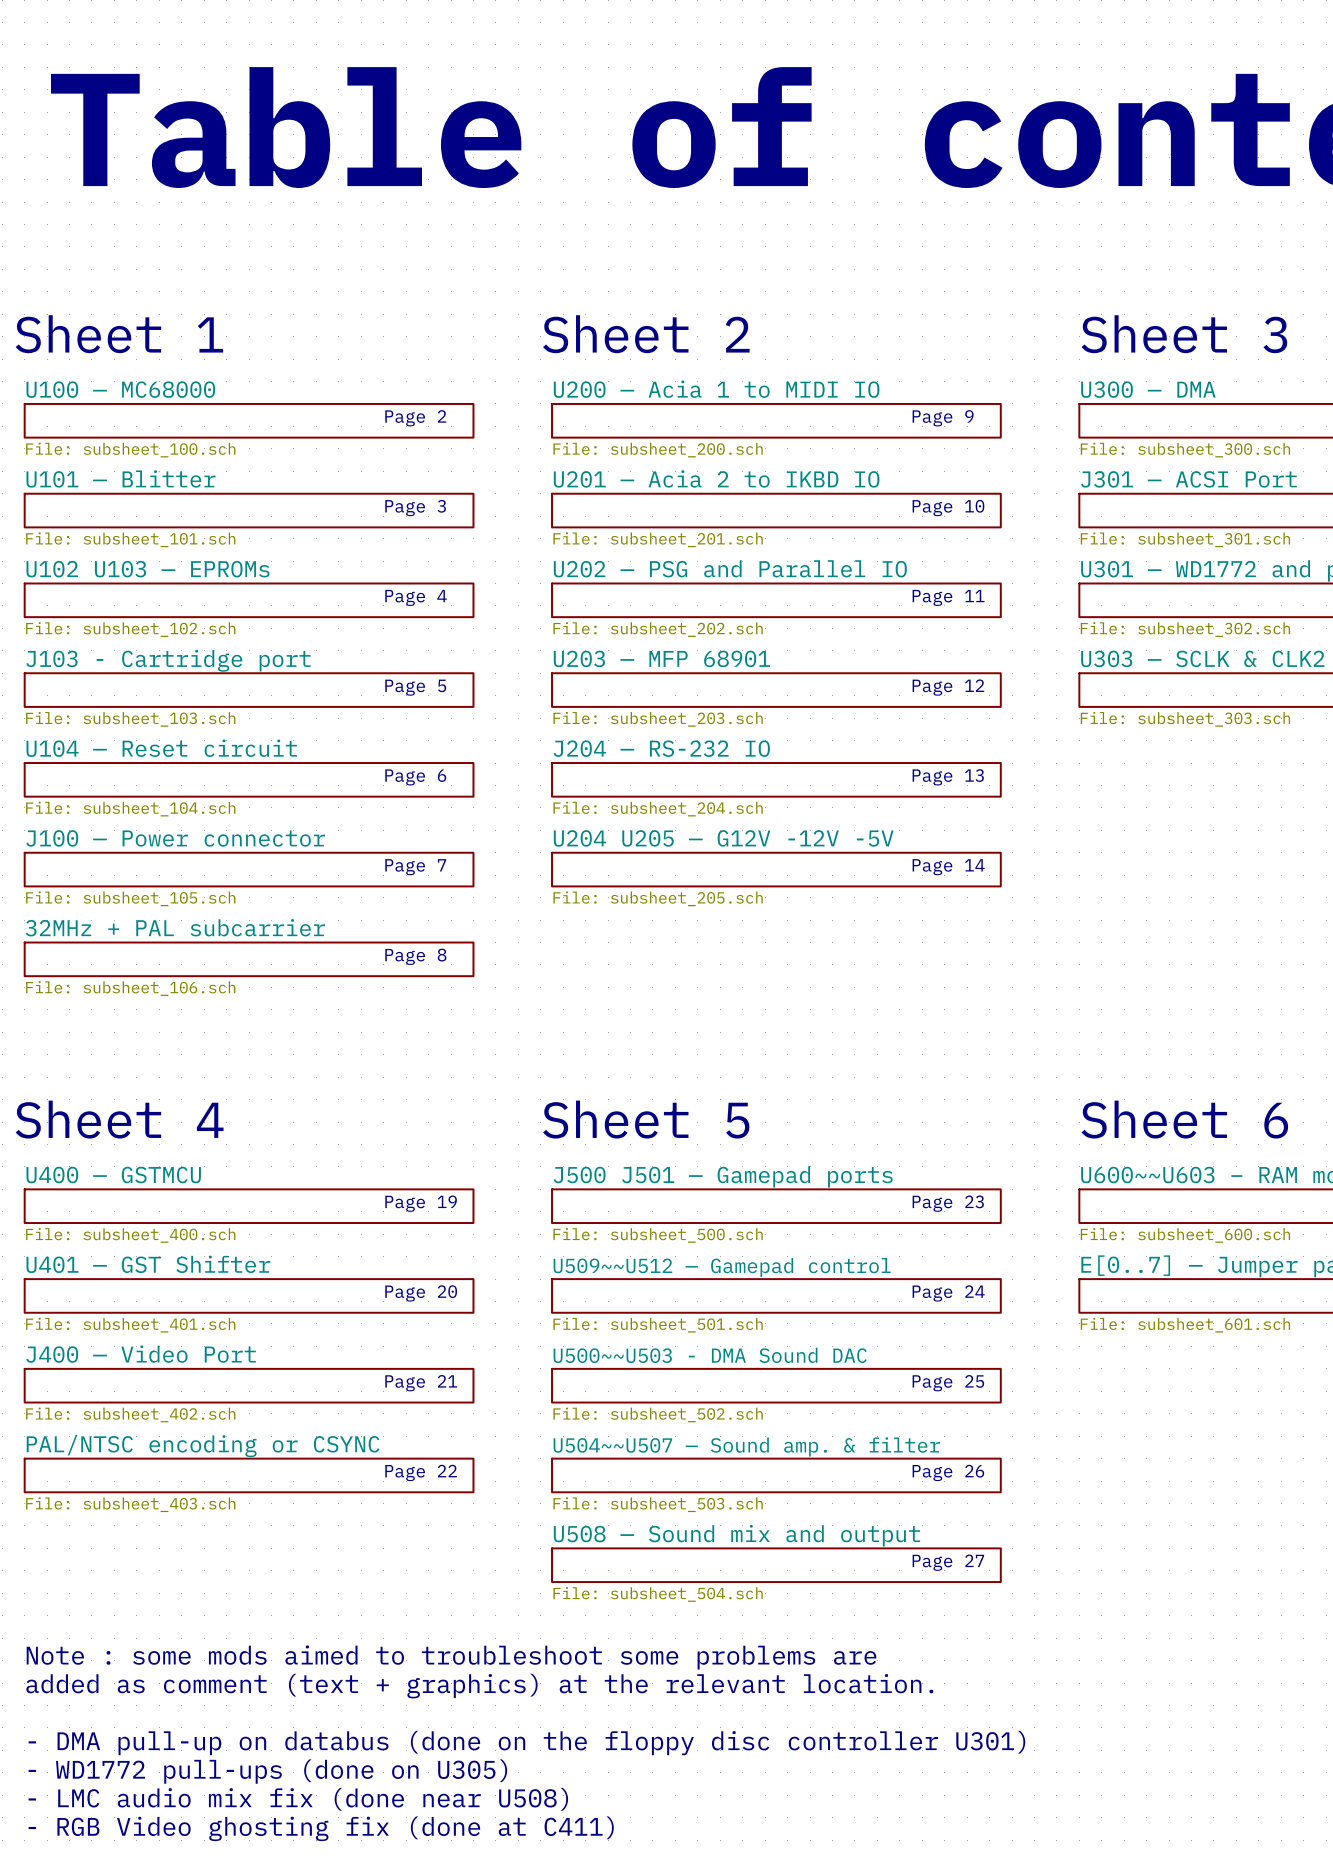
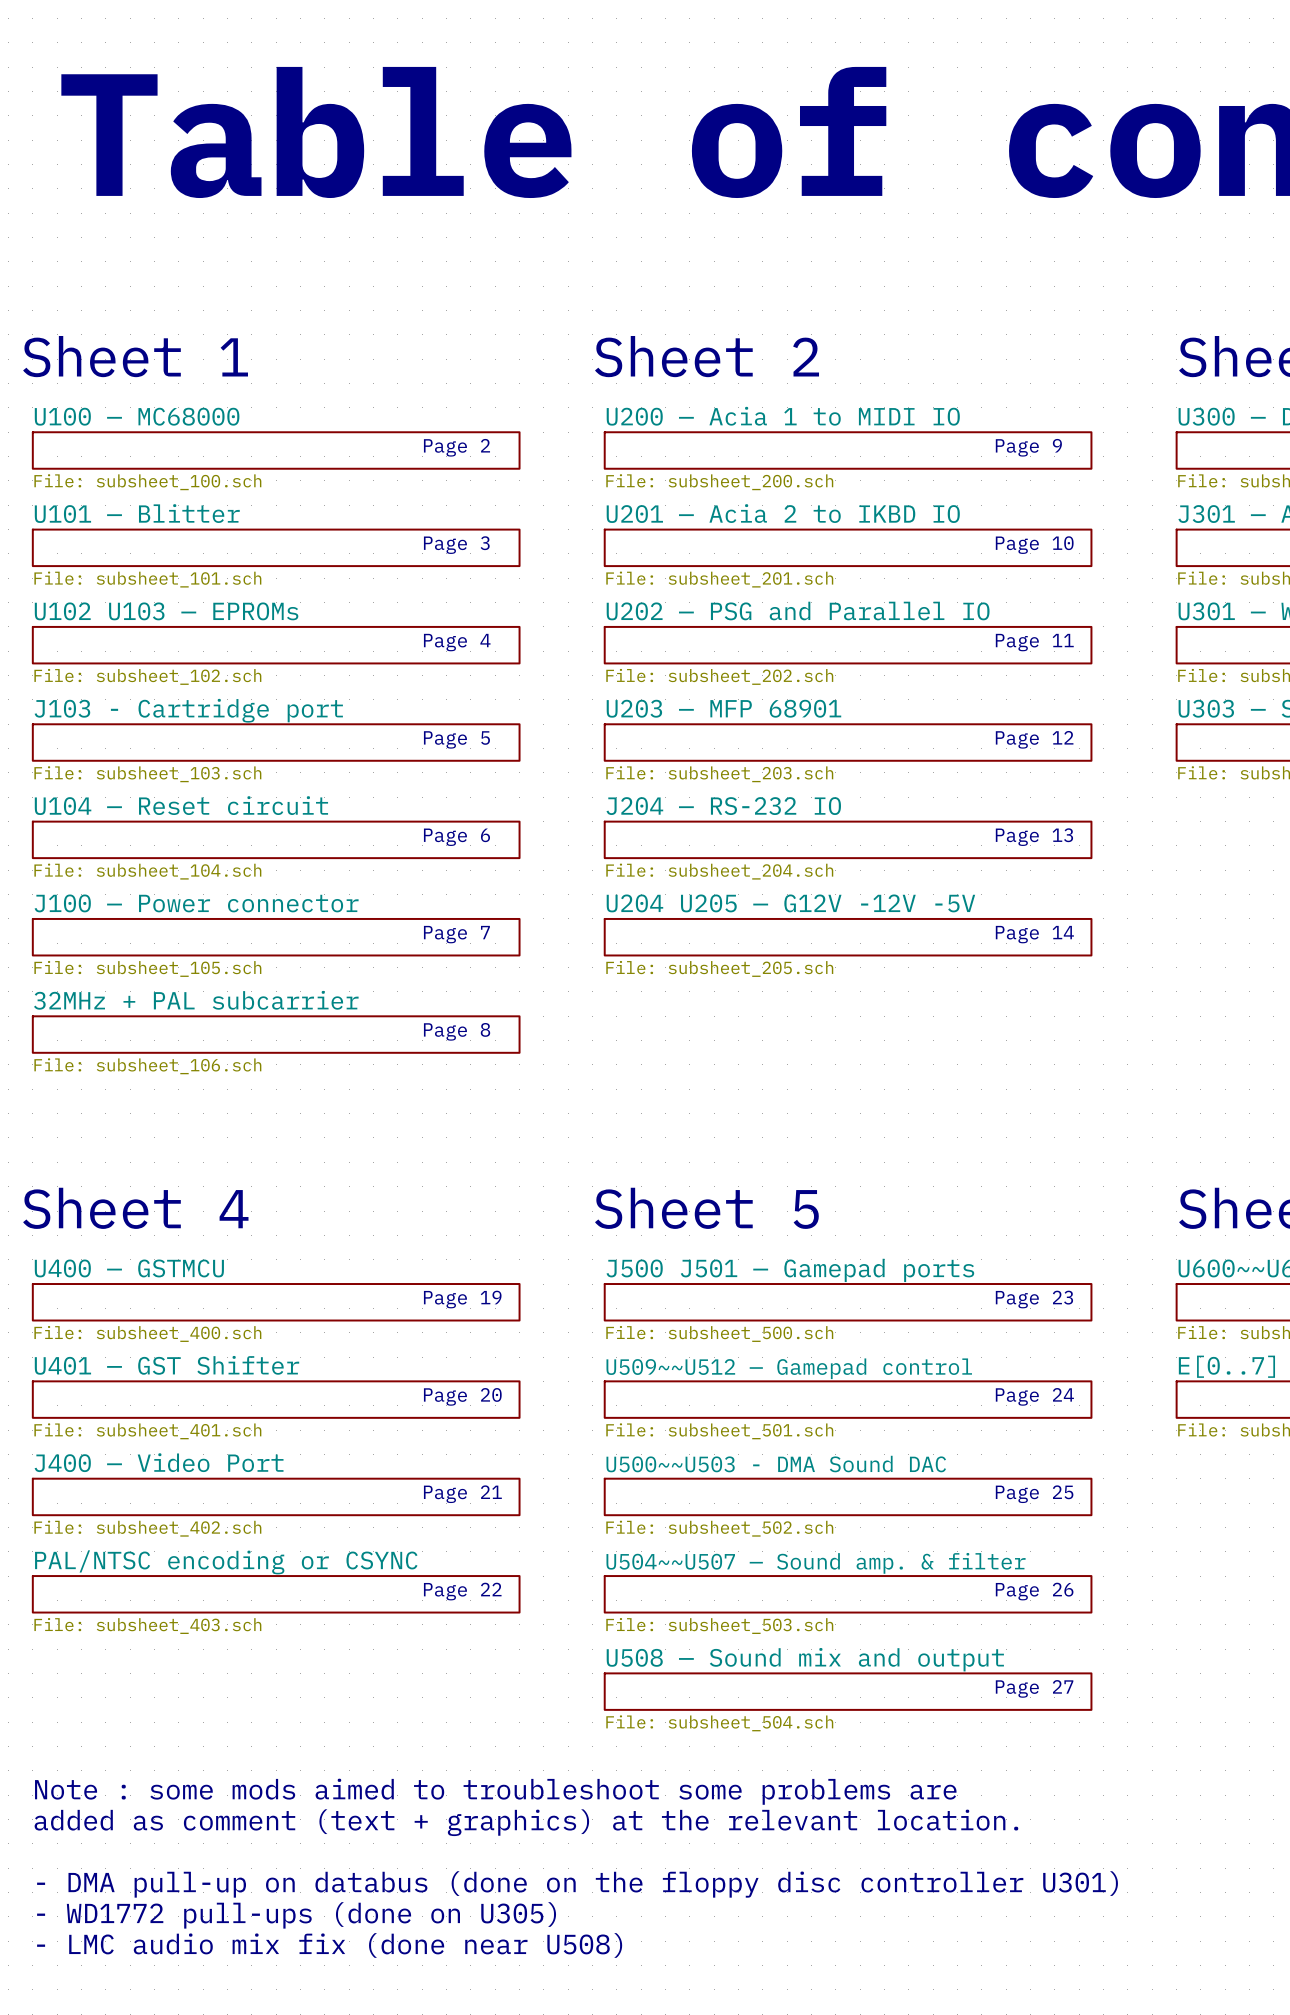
text: - RGB Video ghosting fix (done at C411) (321, 1828) -> none

